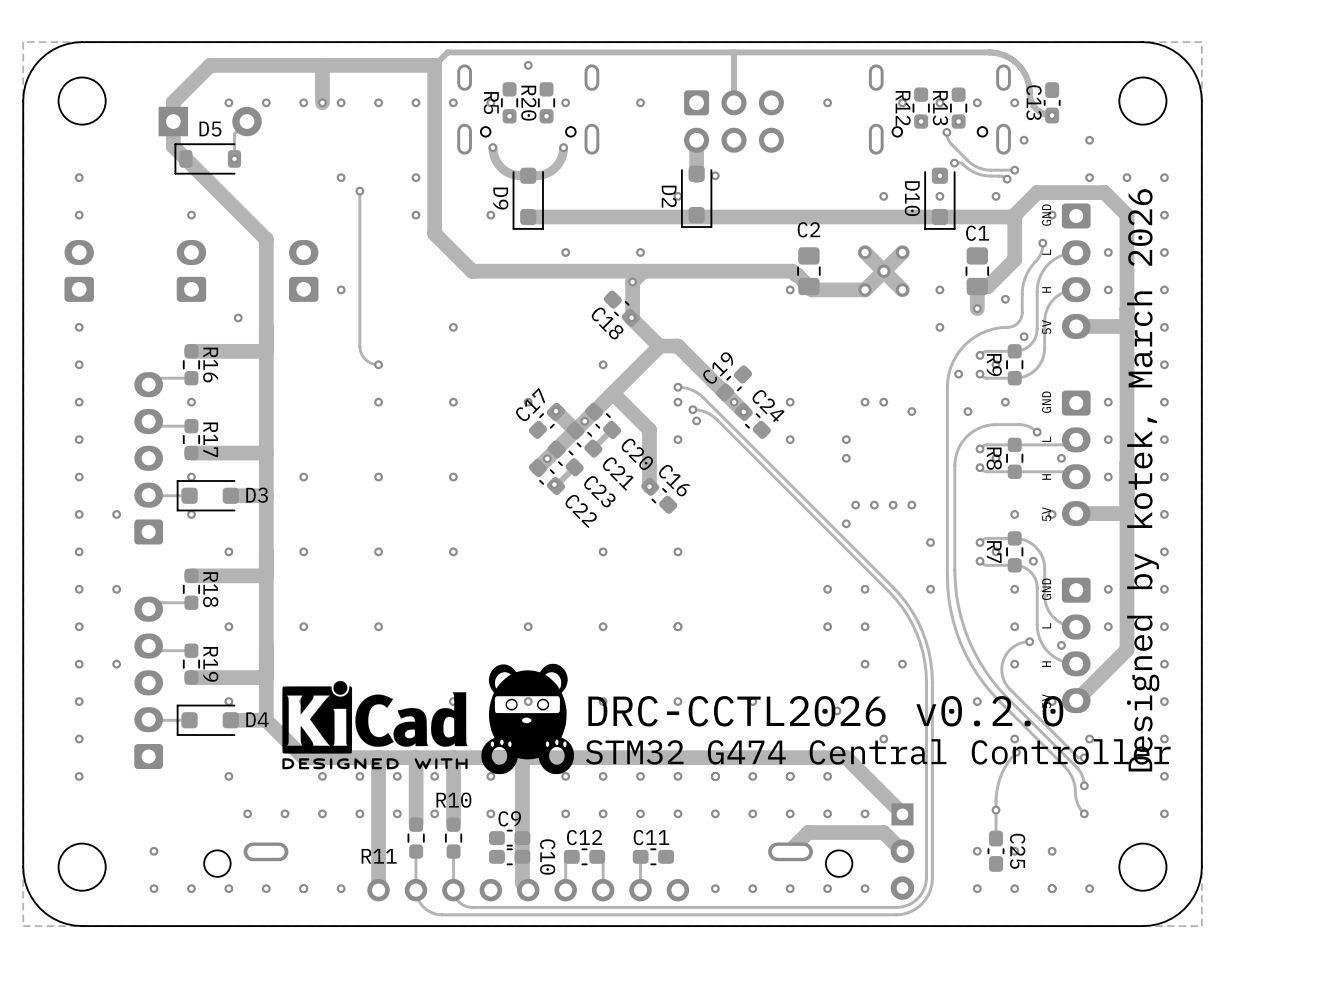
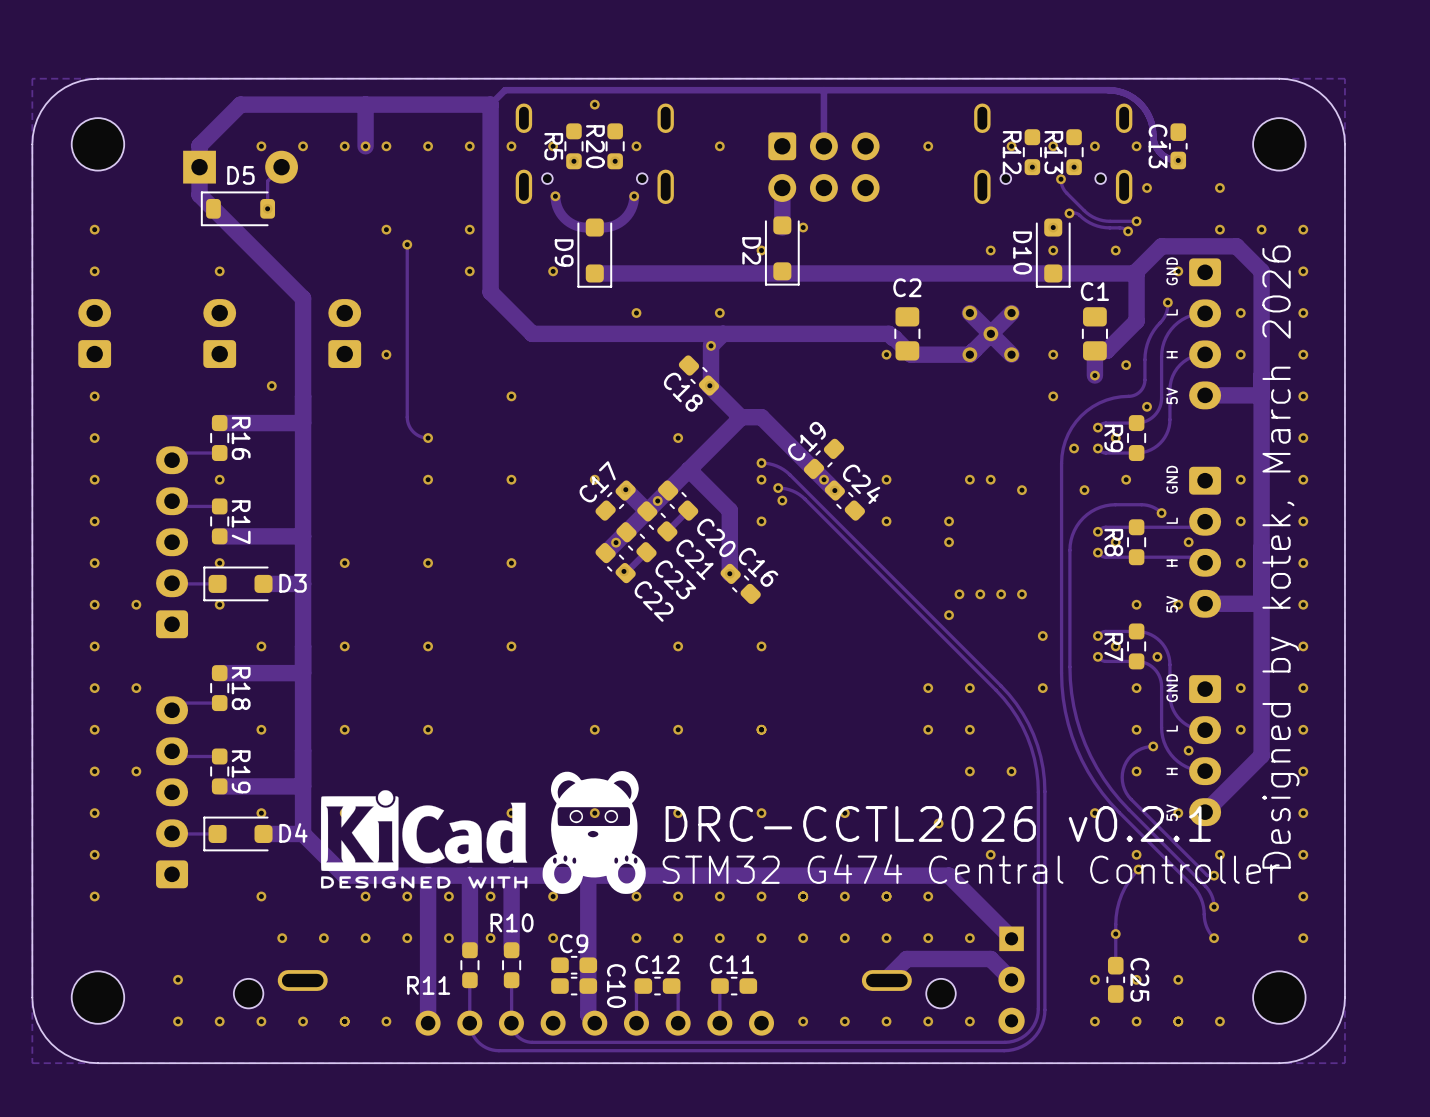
text: DRC-CCTL2026 v0.2.0 (825, 711) -> DRC-CCTL2026 v0.2.1 (938, 823)

